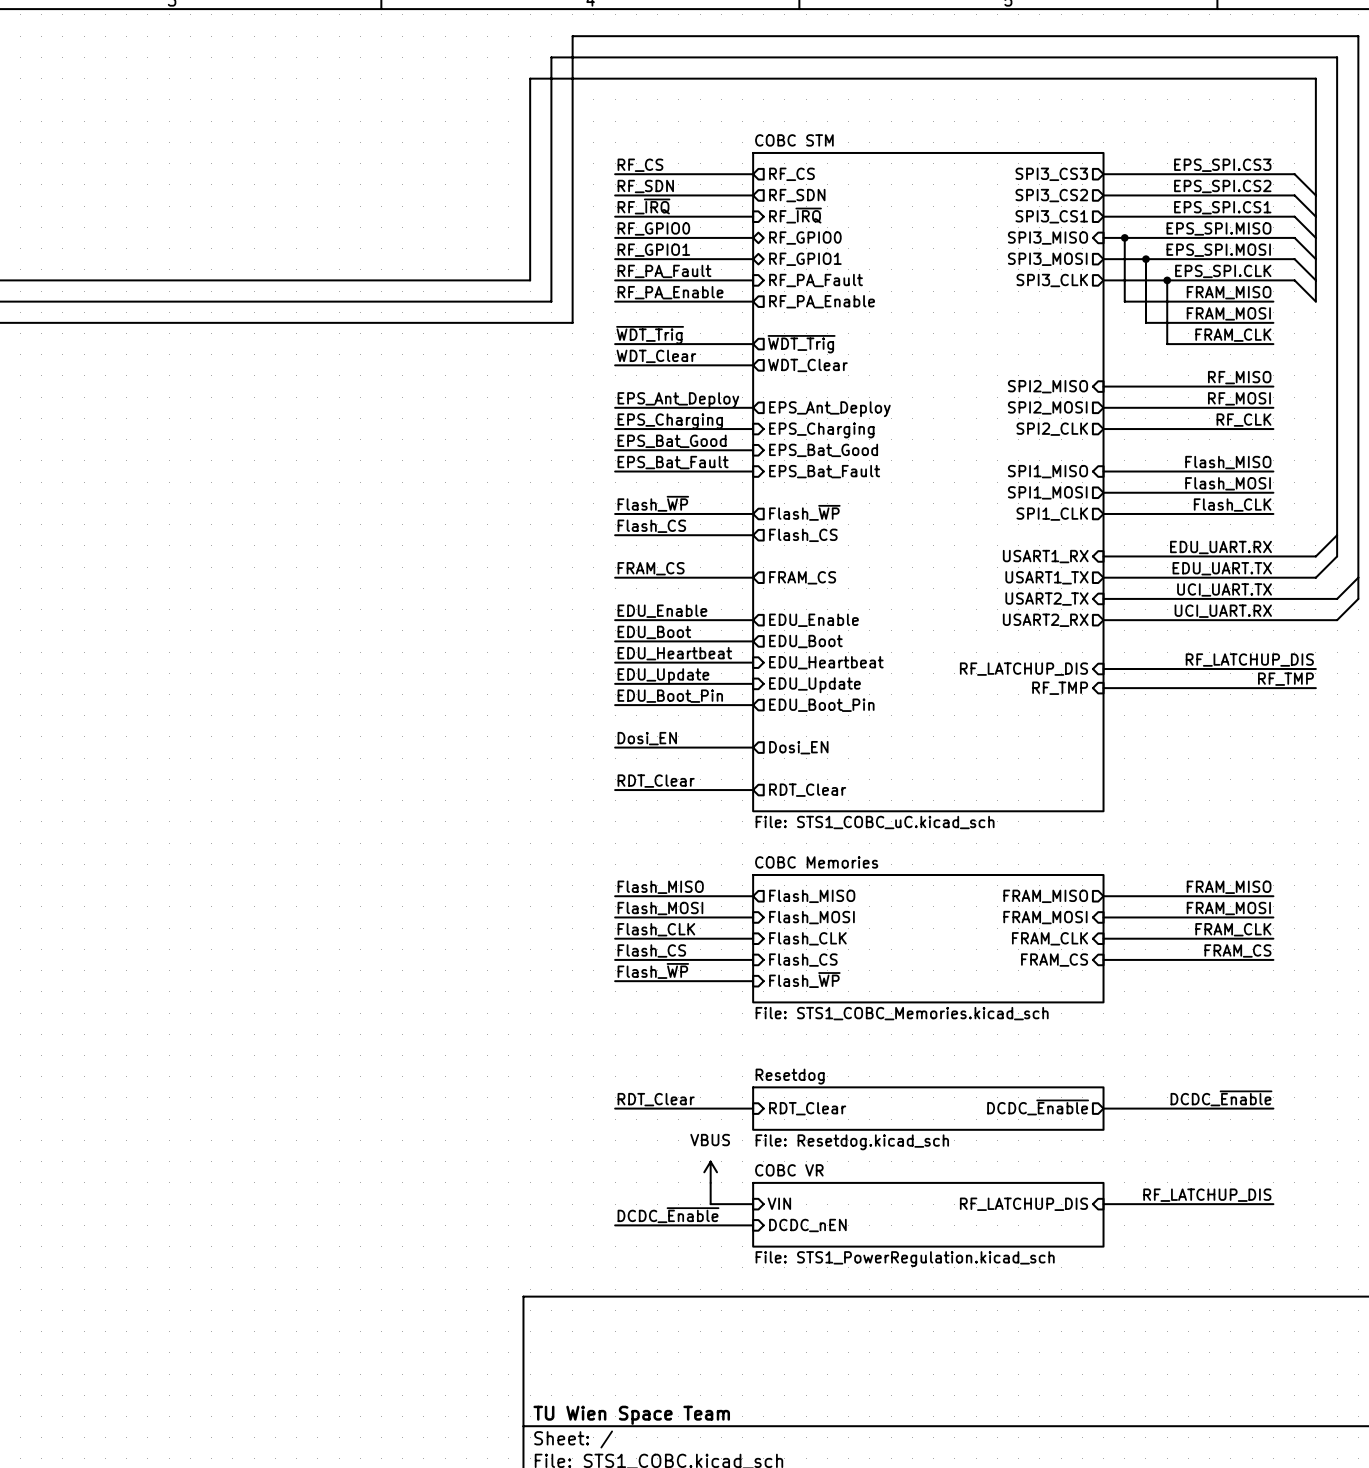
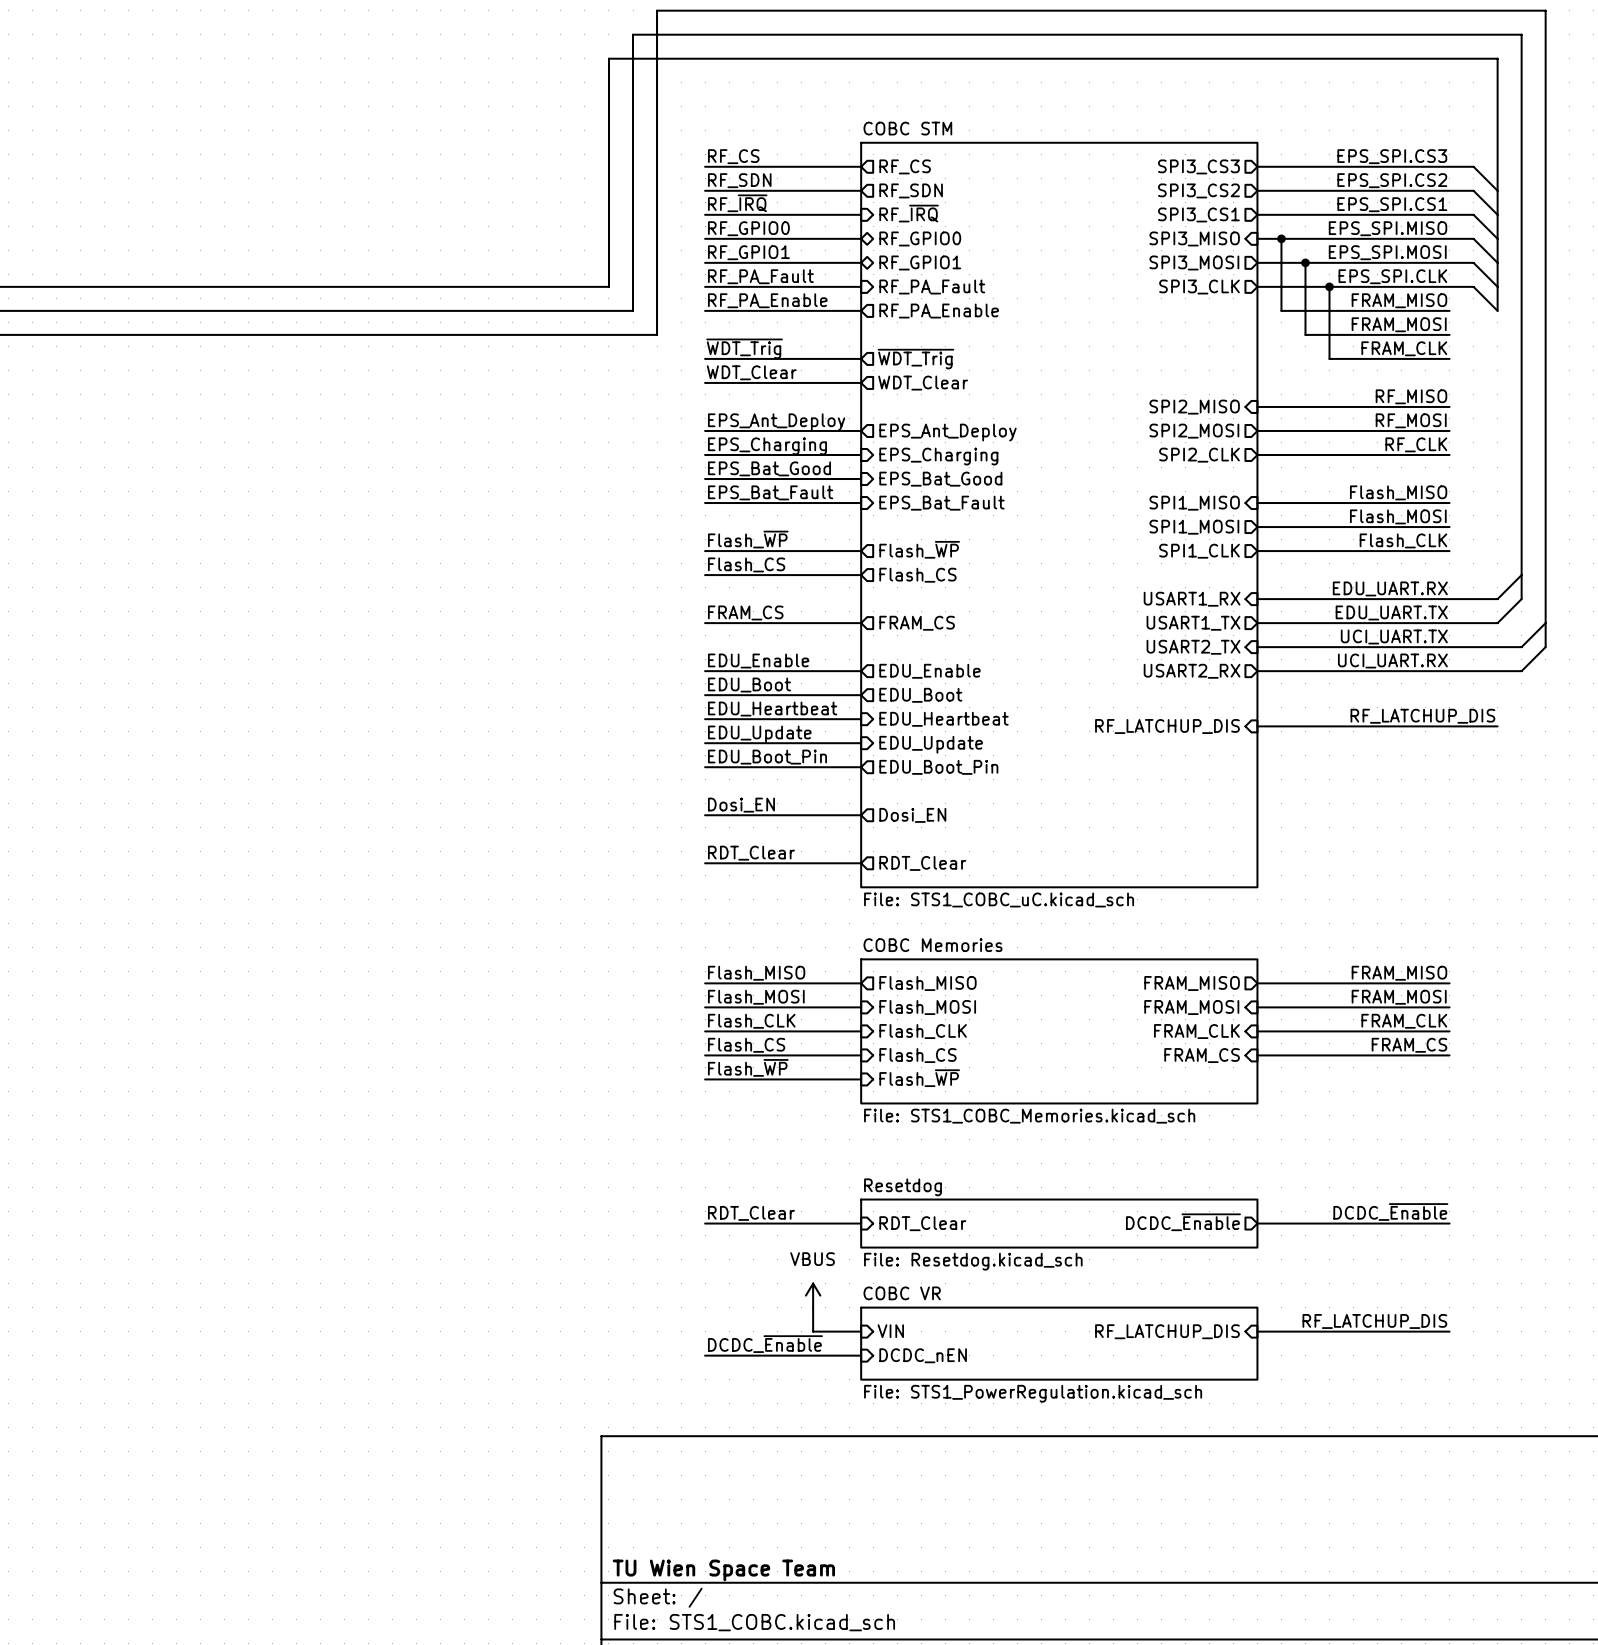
label: RF_TMP (1285, 679) -> none
sheet pin: RF_TMP (1060, 688) -> none
wire: (1103, 688) (1315, 688) -> none

